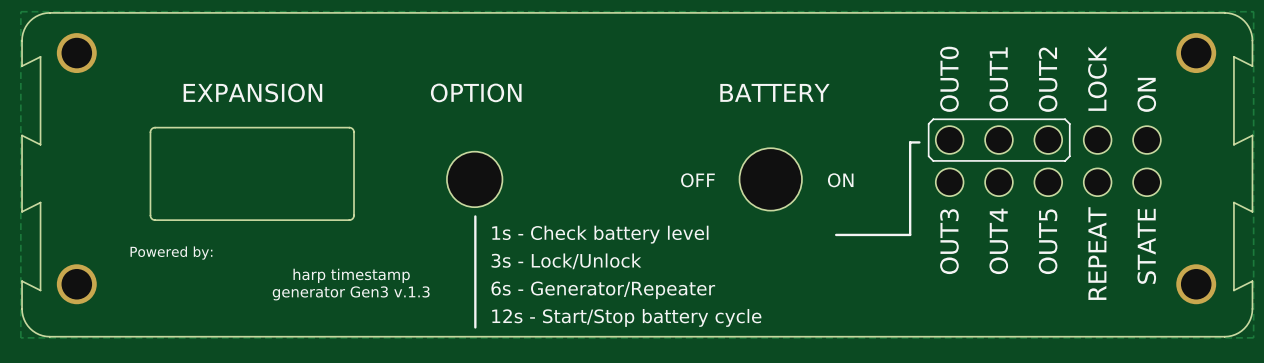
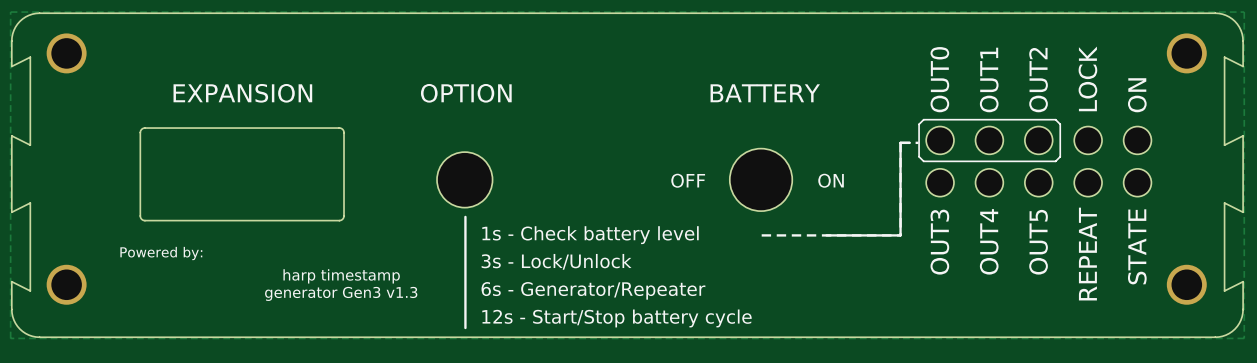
line: none -> (918, 142) (900, 142) (900, 235) (761, 235)
text: generator Gen3 v.1.3 (351, 293) -> generator Gen3 v1.3 (341, 293)

